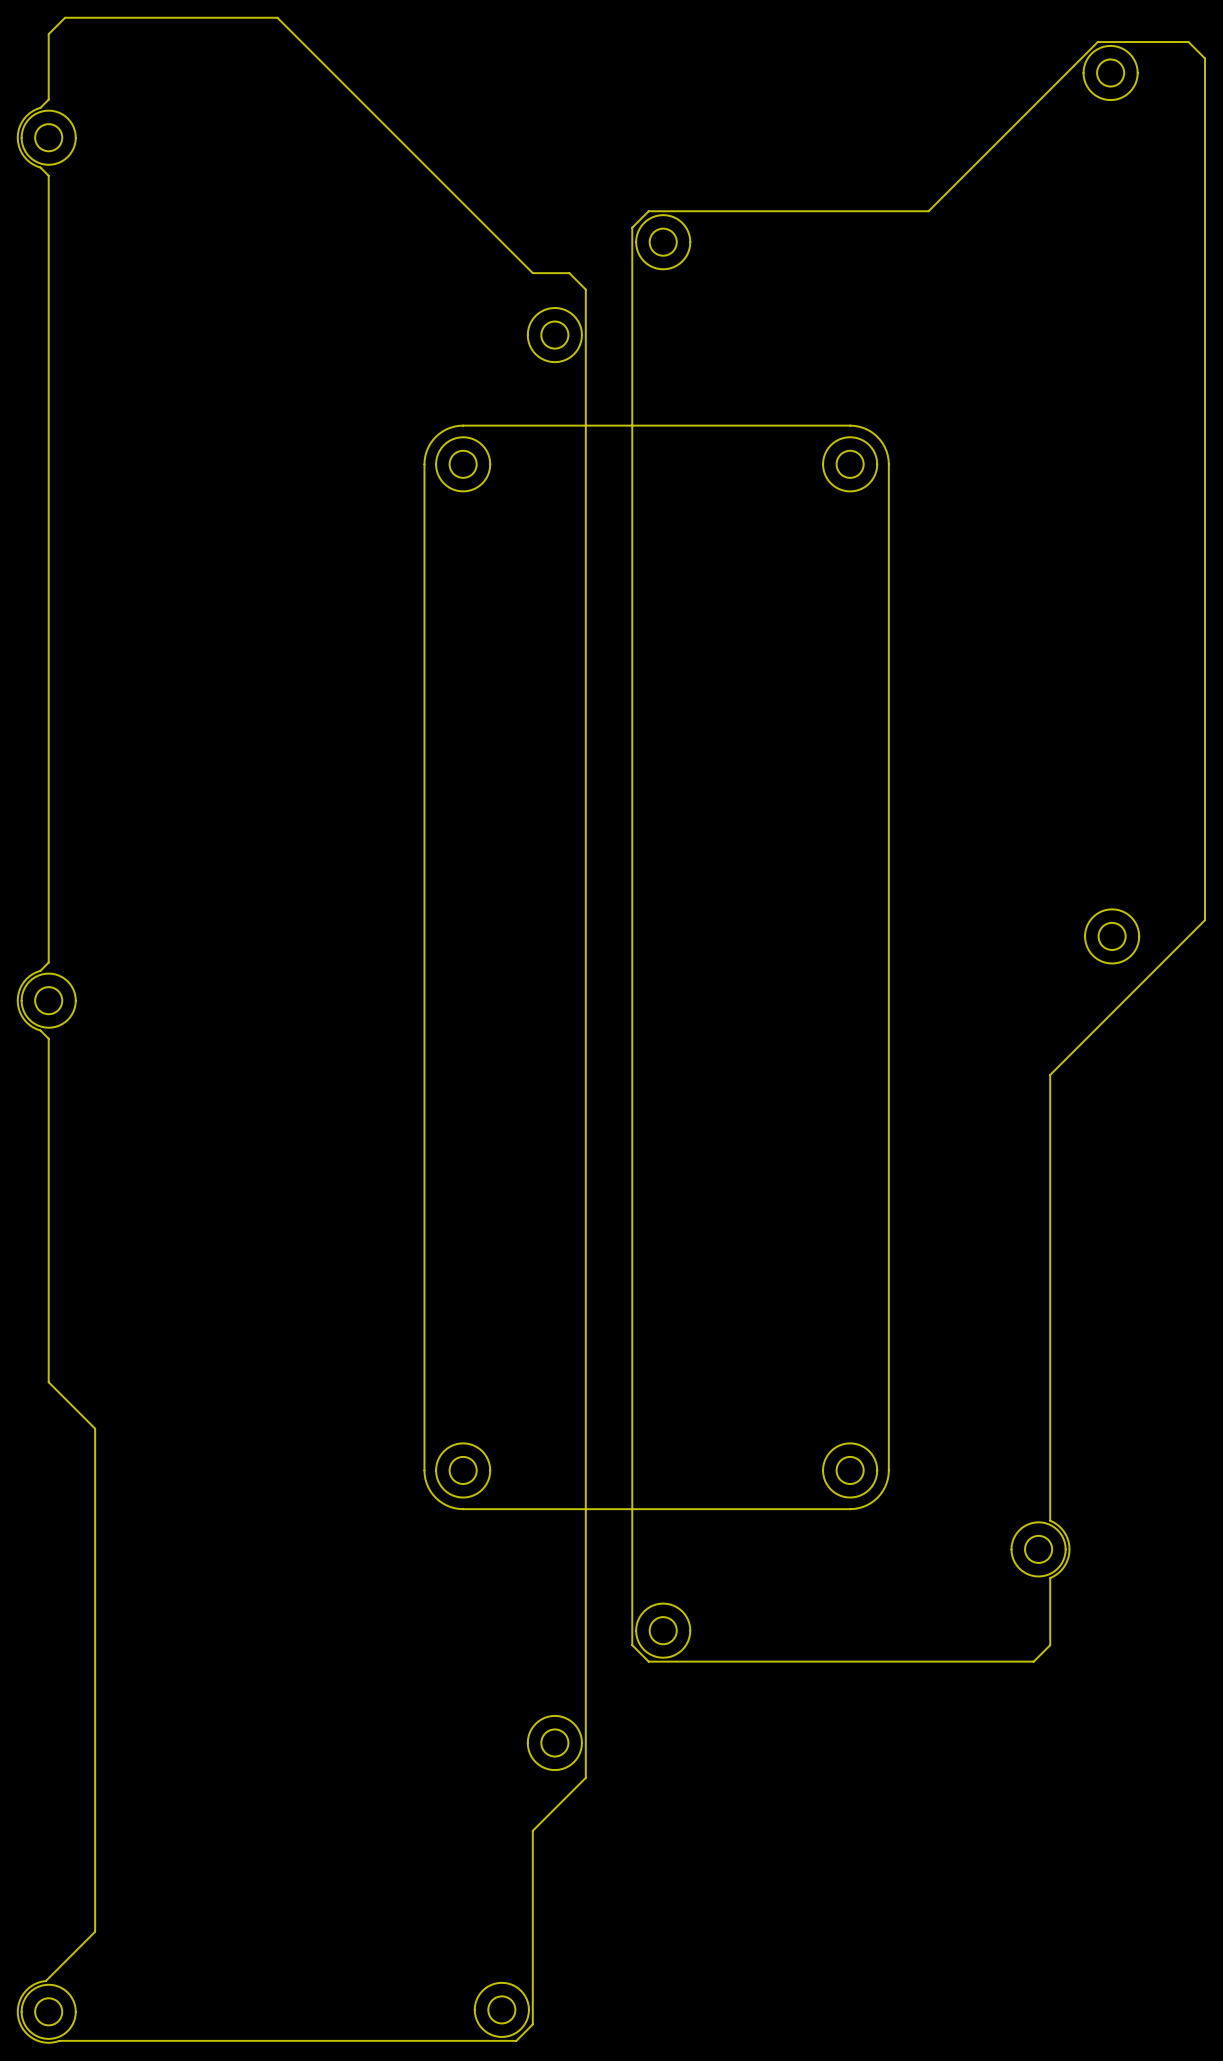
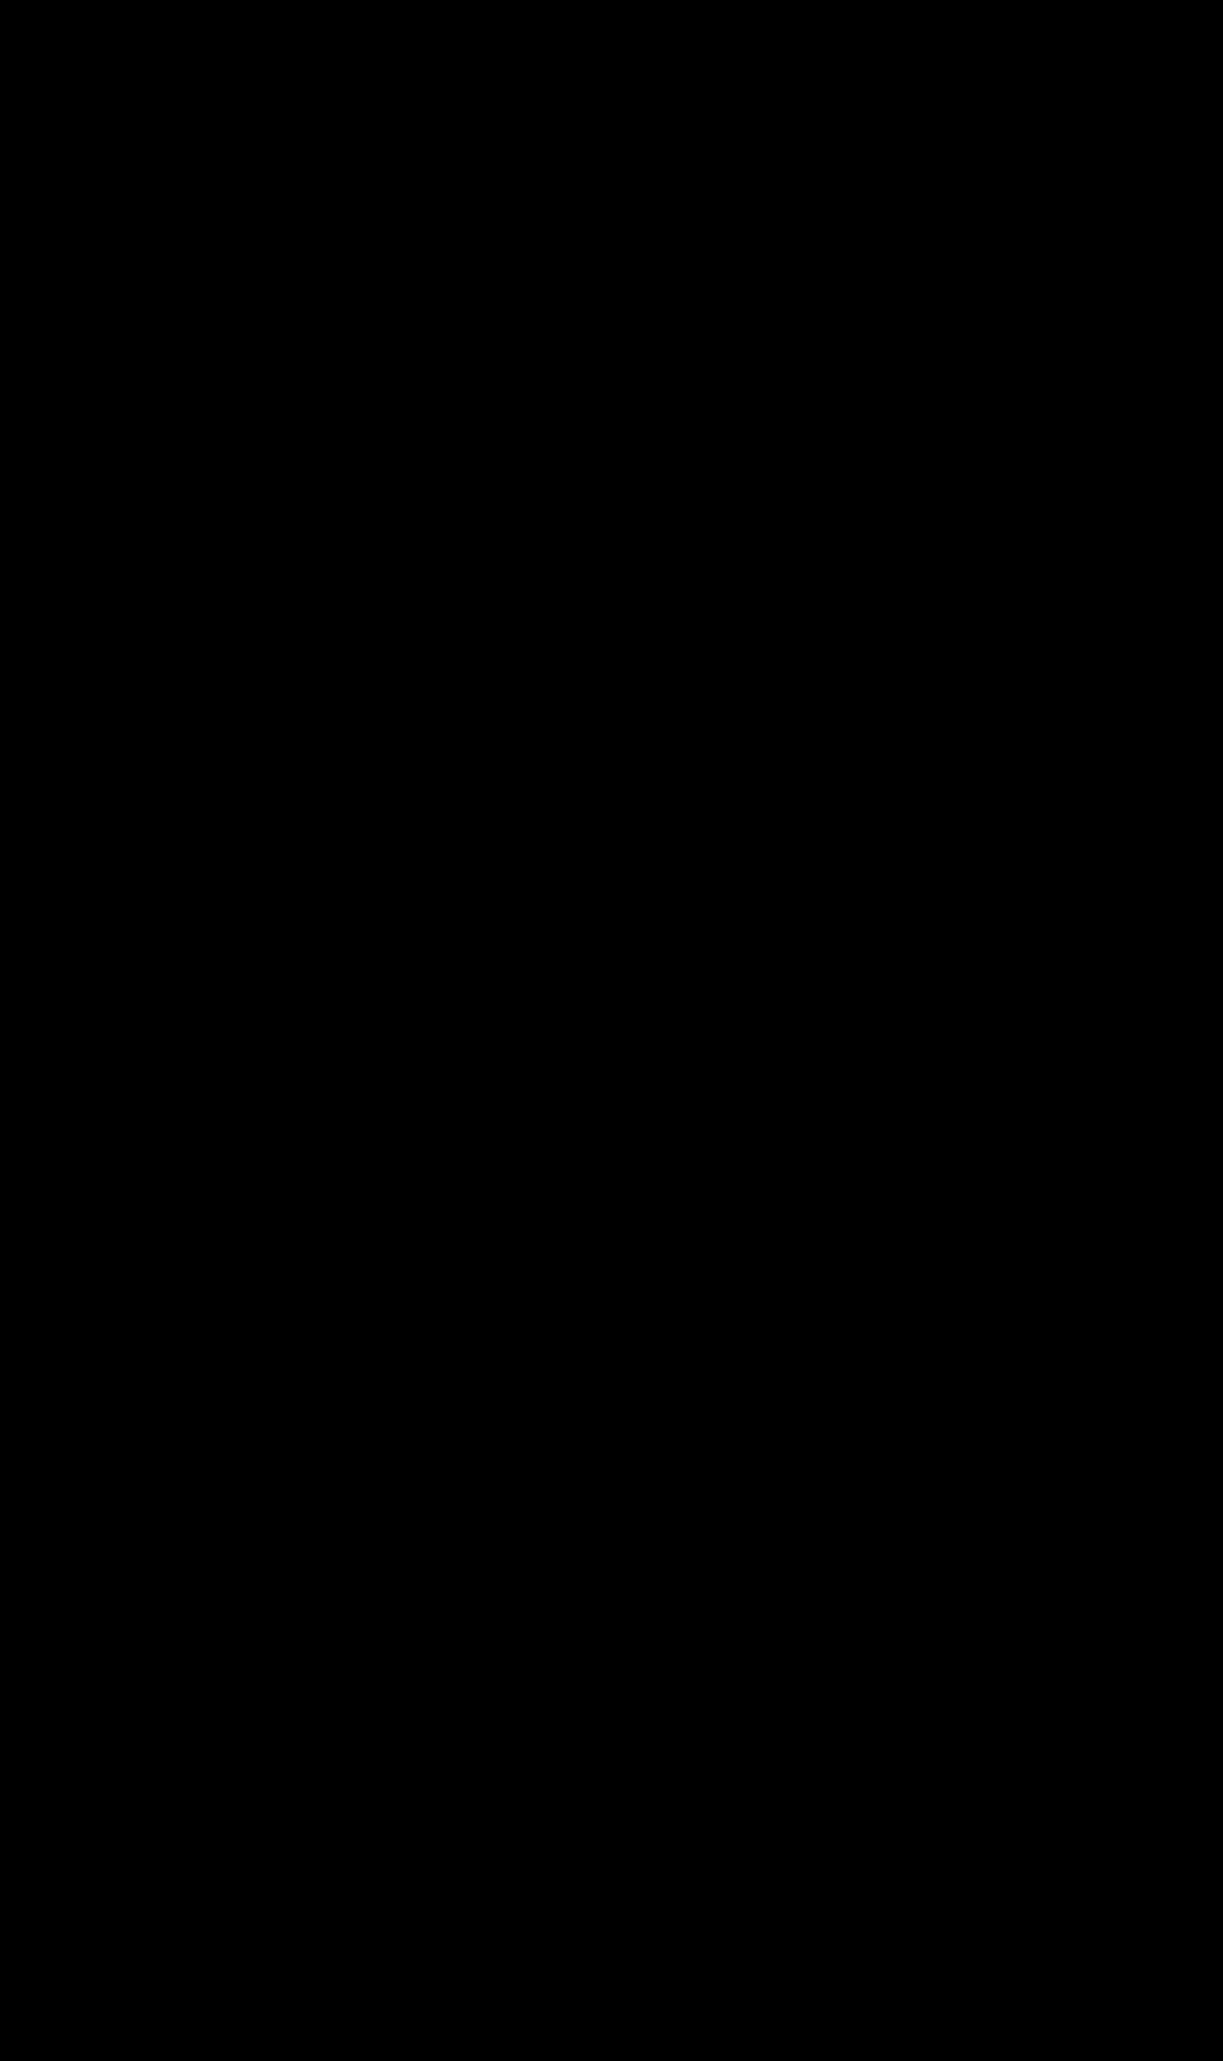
board edge: (65, 17) (277, 17) (532, 273) (569, 273) (585, 289) (585, 1777) (532, 1830) (532, 2024) (516, 2040) (59, 2040) (48, 2042) (37, 2040) (27, 2034) (18, 2018) (18, 2003) (26, 1990) (35, 1984) (45, 1981) (95, 1931) (95, 1428) (48, 1382) (48, 1038) (24, 1019) (18, 1008) (17, 1000) (18, 992) (24, 981) (48, 962) (48, 175) (24, 156) (18, 145) (17, 137) (18, 129) (24, 118) (48, 99) (48, 34) (65, 17) -> none
board edge: (1097, 42) (1188, 42) (1204, 58) (1204, 920) (1050, 1074) (1050, 1520) (1064, 1532) (1069, 1549) (1064, 1566) (1050, 1578) (1050, 1645) (1033, 1661) (648, 1661) (632, 1645) (632, 227) (648, 211) (928, 211) (1097, 42) -> none
round board edge: [1096, 58, 1126, 88] -> none
board edge: (1083, 72) (1085, 62) (1091, 53) (1100, 47) (1110, 45) (1120, 47) (1129, 53) (1135, 62) (1137, 72) (1135, 83) (1129, 92) (1120, 98) (1110, 100) (1100, 98) (1091, 92) (1085, 83) (1083, 72) -> none
round board edge: [34, 123, 64, 153] -> none
board edge: (21, 137) (23, 127) (29, 118) (38, 112) (48, 110) (59, 112) (67, 118) (73, 127) (75, 137) (73, 148) (67, 156) (59, 162) (48, 164) (38, 162) (29, 156) (23, 148) (21, 137) -> none
round board edge: [648, 227, 678, 257] -> none
board edge: (636, 242) (638, 231) (644, 223) (652, 217) (663, 215) (673, 217) (682, 223) (688, 231) (690, 242) (688, 252) (682, 261) (673, 267) (663, 269) (652, 267) (644, 261) (638, 252) (636, 242) -> none
round board edge: [540, 320, 570, 350] -> none
board edge: (527, 335) (529, 324) (535, 315) (544, 310) (554, 307) (565, 310) (574, 315) (579, 324) (581, 335) (579, 345) (574, 354) (565, 360) (554, 362) (544, 360) (535, 354) (529, 345) (527, 335) -> none
board edge: (463, 425) (854, 425) (874, 434) (886, 451) (888, 464) (888, 1470) (882, 1491) (874, 1500) (862, 1506) (850, 1509) (463, 1509) (450, 1506) (439, 1500) (426, 1483) (424, 1470) (424, 464) (428, 447) (435, 436) (450, 427) (463, 425) -> none
round board edge: [448, 449, 478, 479] -> none
round board edge: [835, 449, 865, 479] -> none
board edge: (436, 464) (438, 453) (444, 445) (452, 439) (463, 437) (473, 439) (482, 445) (488, 453) (490, 464) (488, 474) (482, 483) (473, 489) (463, 491) (452, 489) (444, 483) (438, 474) (436, 464) -> none
board edge: (823, 464) (825, 453) (830, 445) (839, 439) (850, 437) (860, 439) (869, 445) (875, 453) (877, 464) (875, 474) (869, 483) (860, 489) (850, 491) (839, 489) (830, 483) (825, 474) (823, 464) -> none
round board edge: [1097, 921, 1127, 951] -> none
board edge: (1085, 936) (1087, 926) (1092, 917) (1101, 911) (1112, 909) (1122, 911) (1131, 917) (1137, 926) (1139, 936) (1137, 946) (1131, 955) (1122, 961) (1112, 963) (1101, 961) (1092, 955) (1087, 946) (1085, 936) -> none
round board edge: [34, 986, 64, 1016] -> none
board edge: (21, 1000) (23, 990) (29, 981) (38, 975) (48, 973) (59, 975) (67, 981) (73, 990) (75, 1000) (73, 1011) (67, 1019) (59, 1025) (48, 1027) (38, 1025) (29, 1019) (23, 1011) (21, 1000) -> none
round board edge: [448, 1455, 478, 1485] -> none
round board edge: [835, 1455, 865, 1485] -> none
board edge: (436, 1470) (438, 1460) (444, 1451) (452, 1445) (463, 1443) (473, 1445) (482, 1451) (488, 1460) (490, 1470) (488, 1480) (482, 1489) (473, 1495) (463, 1497) (452, 1495) (444, 1489) (438, 1480) (436, 1470) -> none
board edge: (823, 1470) (825, 1460) (830, 1451) (839, 1445) (850, 1443) (860, 1445) (869, 1451) (875, 1460) (877, 1470) (875, 1480) (869, 1489) (860, 1495) (850, 1497) (839, 1495) (830, 1489) (825, 1480) (823, 1470) -> none
round board edge: [1024, 1534, 1054, 1564] -> none
board edge: (1011, 1549) (1013, 1539) (1019, 1530) (1028, 1524) (1038, 1522) (1048, 1524) (1057, 1530) (1063, 1539) (1065, 1549) (1063, 1559) (1057, 1568) (1048, 1574) (1038, 1576) (1028, 1574) (1019, 1568) (1013, 1559) (1011, 1549) -> none
round board edge: [648, 1616, 678, 1646] -> none
board edge: (636, 1630) (638, 1620) (644, 1611) (652, 1605) (663, 1603) (673, 1605) (682, 1611) (688, 1620) (690, 1630) (688, 1641) (682, 1649) (673, 1655) (663, 1657) (652, 1655) (644, 1649) (638, 1641) (636, 1630) -> none
round board edge: [540, 1728, 570, 1758] -> none
board edge: (527, 1742) (529, 1732) (535, 1723) (544, 1717) (554, 1715) (565, 1717) (574, 1723) (579, 1732) (581, 1742) (579, 1753) (574, 1762) (565, 1768) (554, 1770) (544, 1768) (535, 1762) (529, 1753) (527, 1742) -> none
round board edge: [487, 1995, 517, 2025] -> none
round board edge: [34, 1997, 64, 2027] -> none
board edge: (474, 2009) (476, 1999) (482, 1990) (491, 1984) (501, 1982) (512, 1984) (521, 1990) (526, 1999) (528, 2009) (526, 2020) (521, 2029) (512, 2034) (501, 2036) (491, 2034) (482, 2029) (476, 2020) (474, 2009) -> none
board edge: (21, 2011) (23, 2001) (29, 1992) (38, 1986) (48, 1984) (59, 1986) (67, 1992) (73, 2001) (75, 2011) (73, 2022) (67, 2030) (59, 2036) (48, 2038) (38, 2036) (29, 2030) (23, 2022) (21, 2011) -> none

